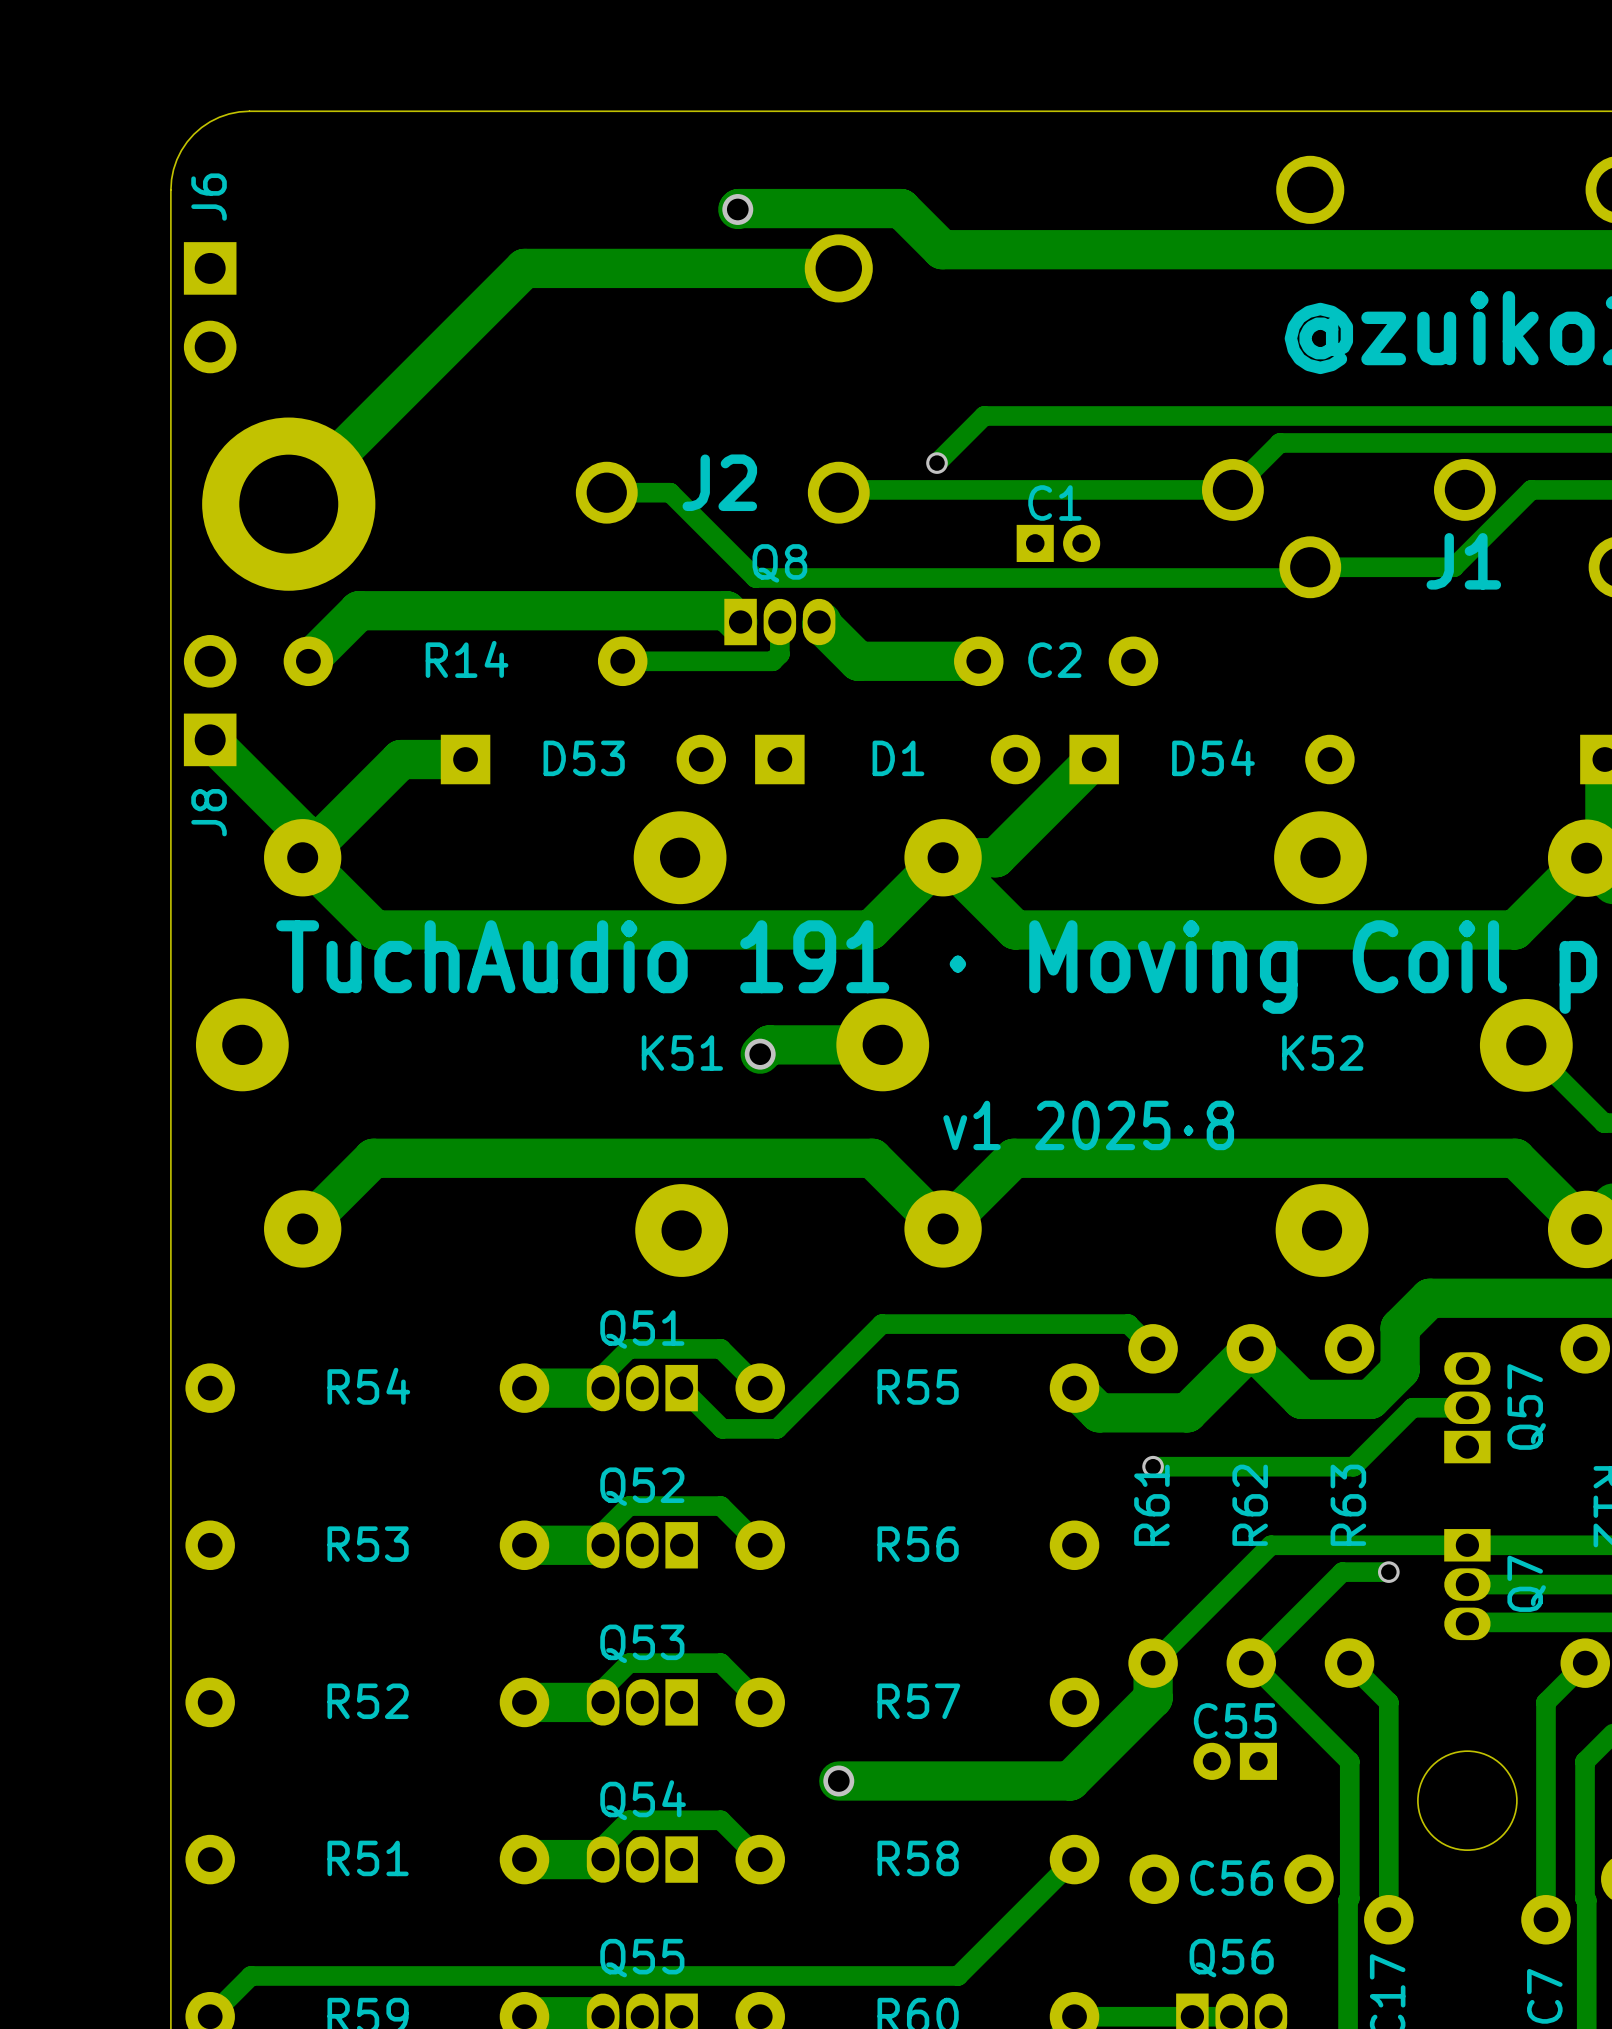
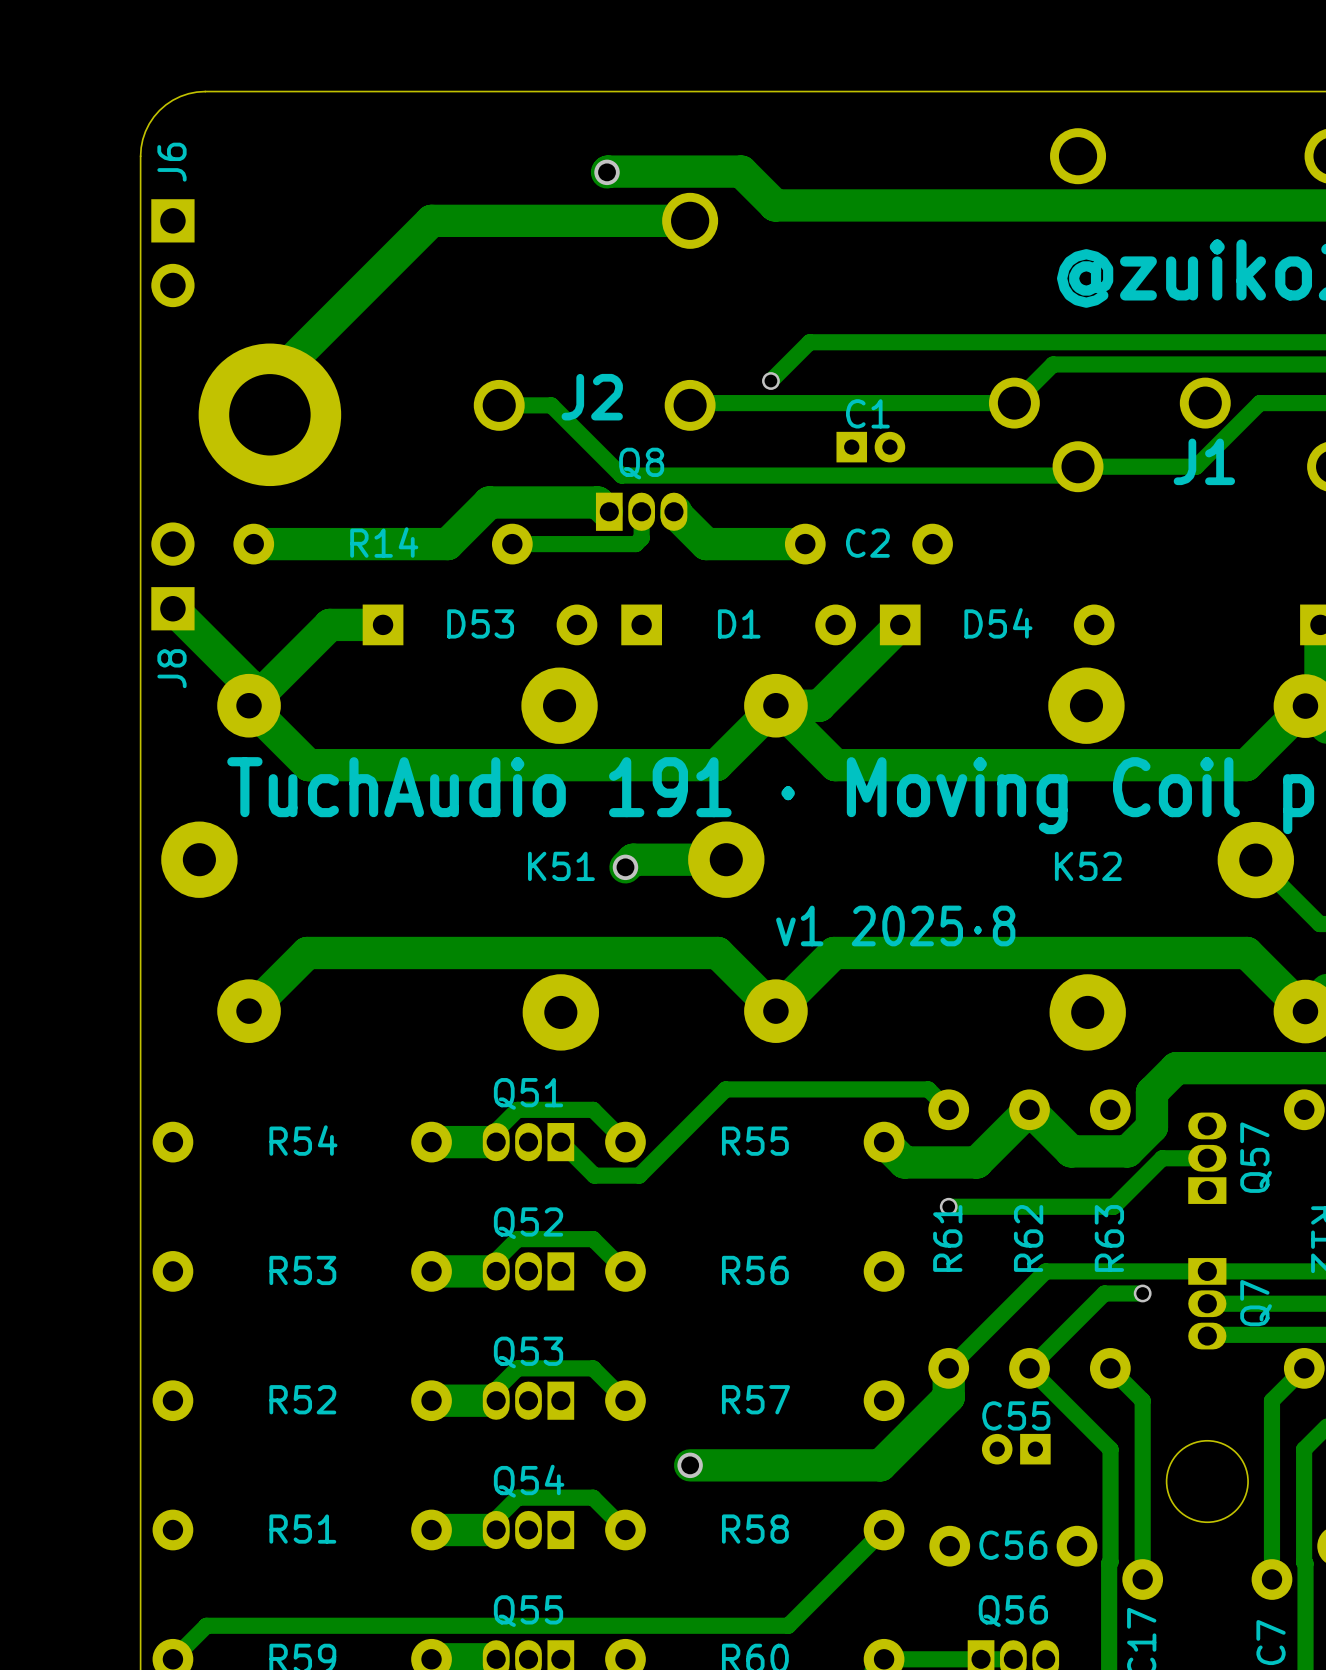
part position: (288, 504) -> (269, 414)
track: (594, 610) (358, 610) (308, 661) -> (489, 502) (447, 544) (253, 544)

